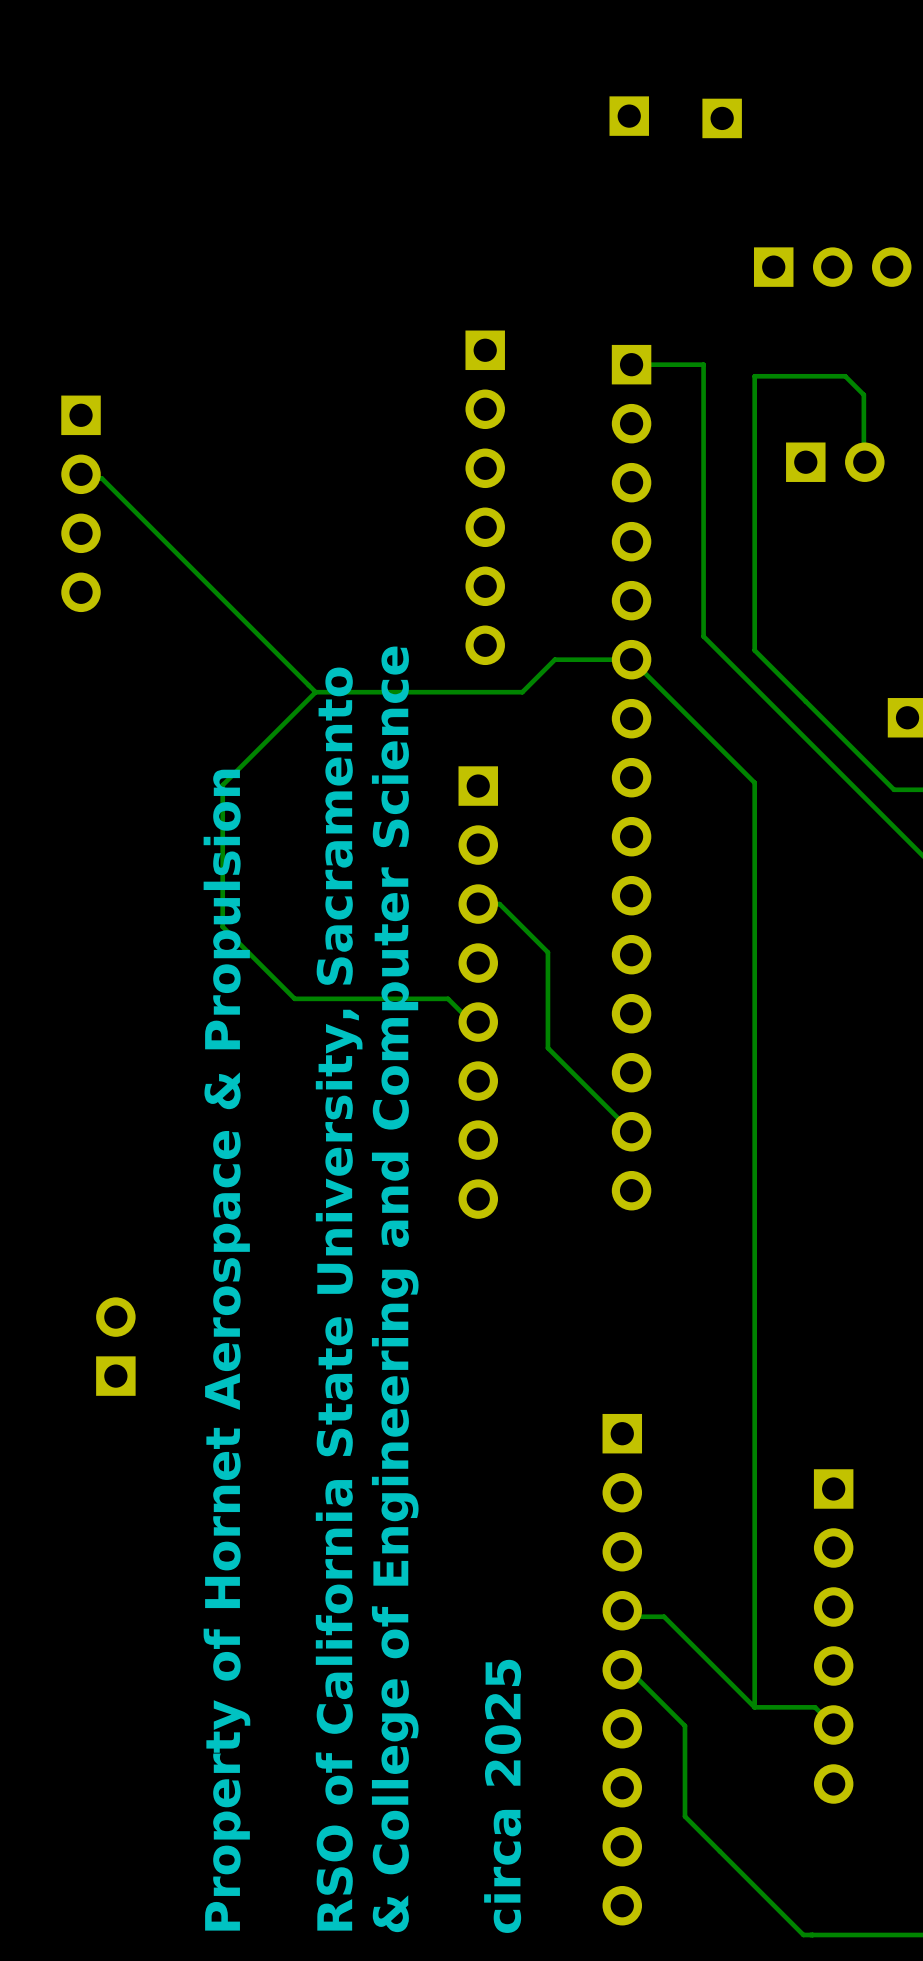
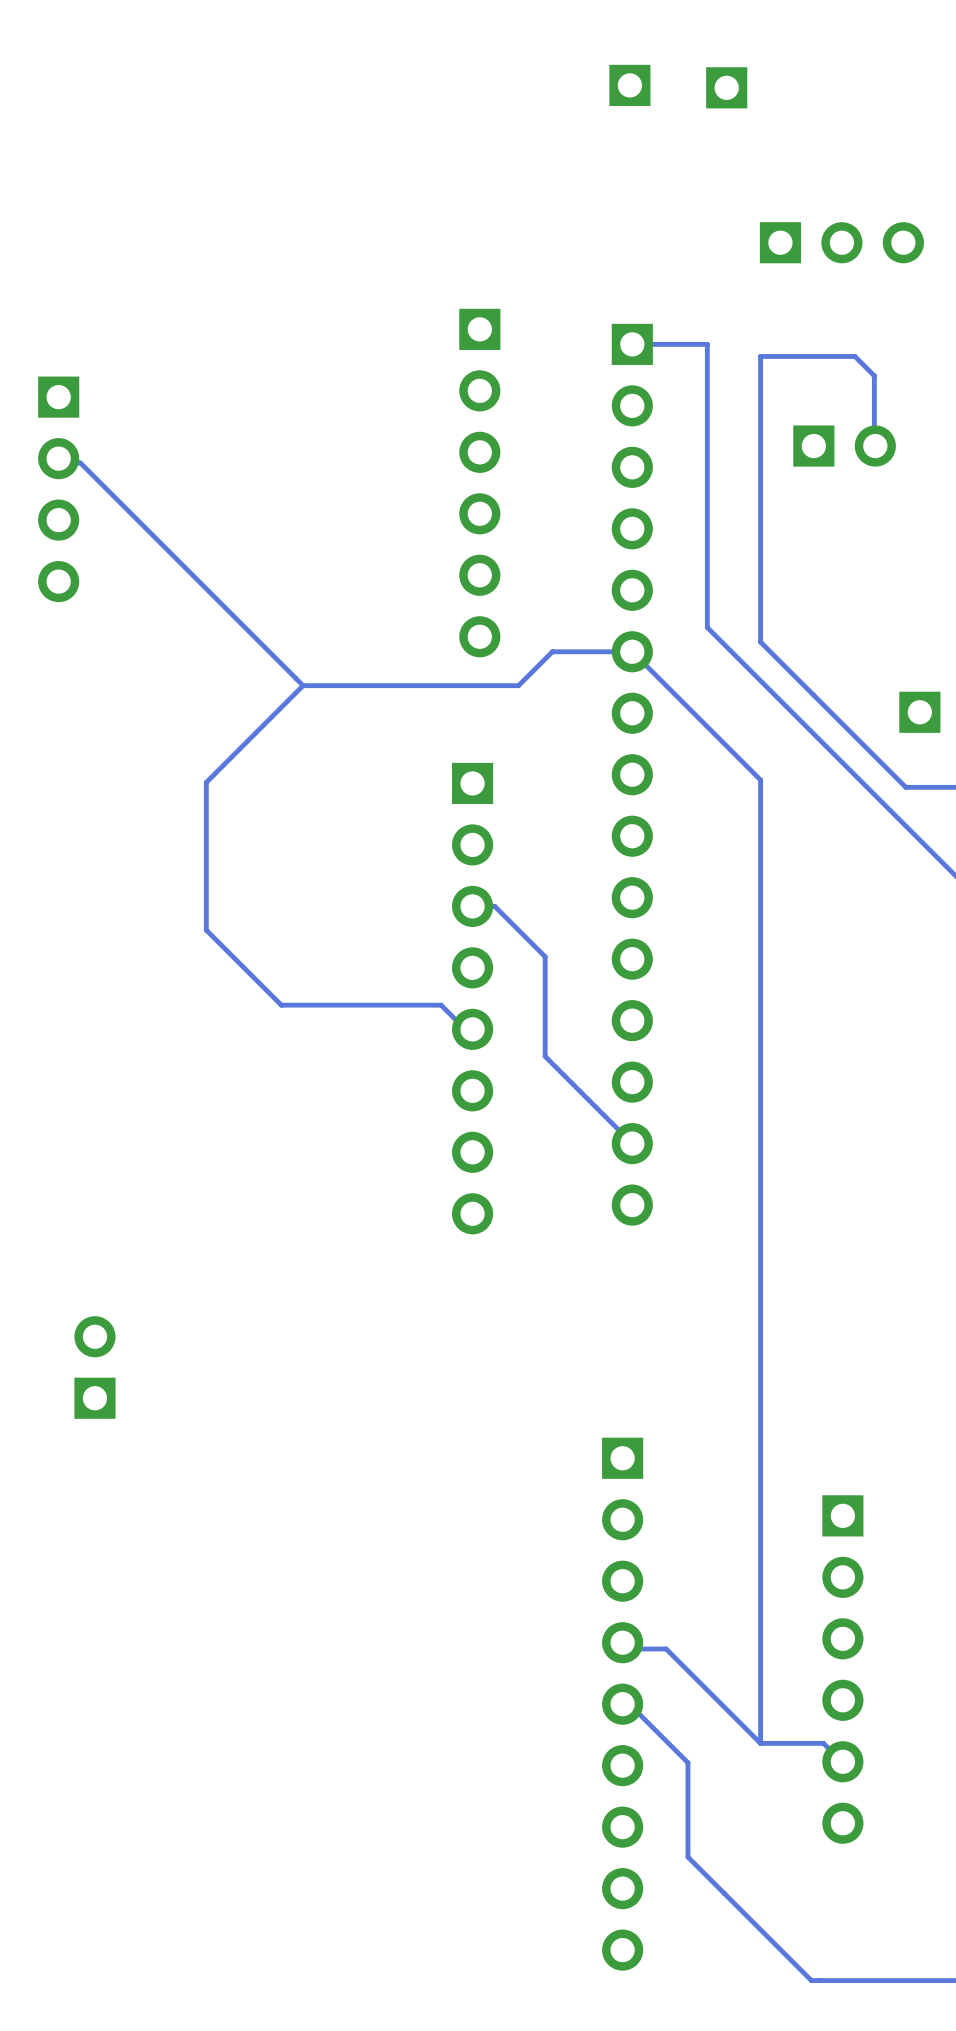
text: & College of Engineering and Computer Science (395, 1289) -> none
text: RSO of California State University, Sacramento (339, 1299) -> none
text: Property of Hornet Aerospace & Propulsion (226, 1350) -> none
text: circa 2025 (502, 1796) -> none

